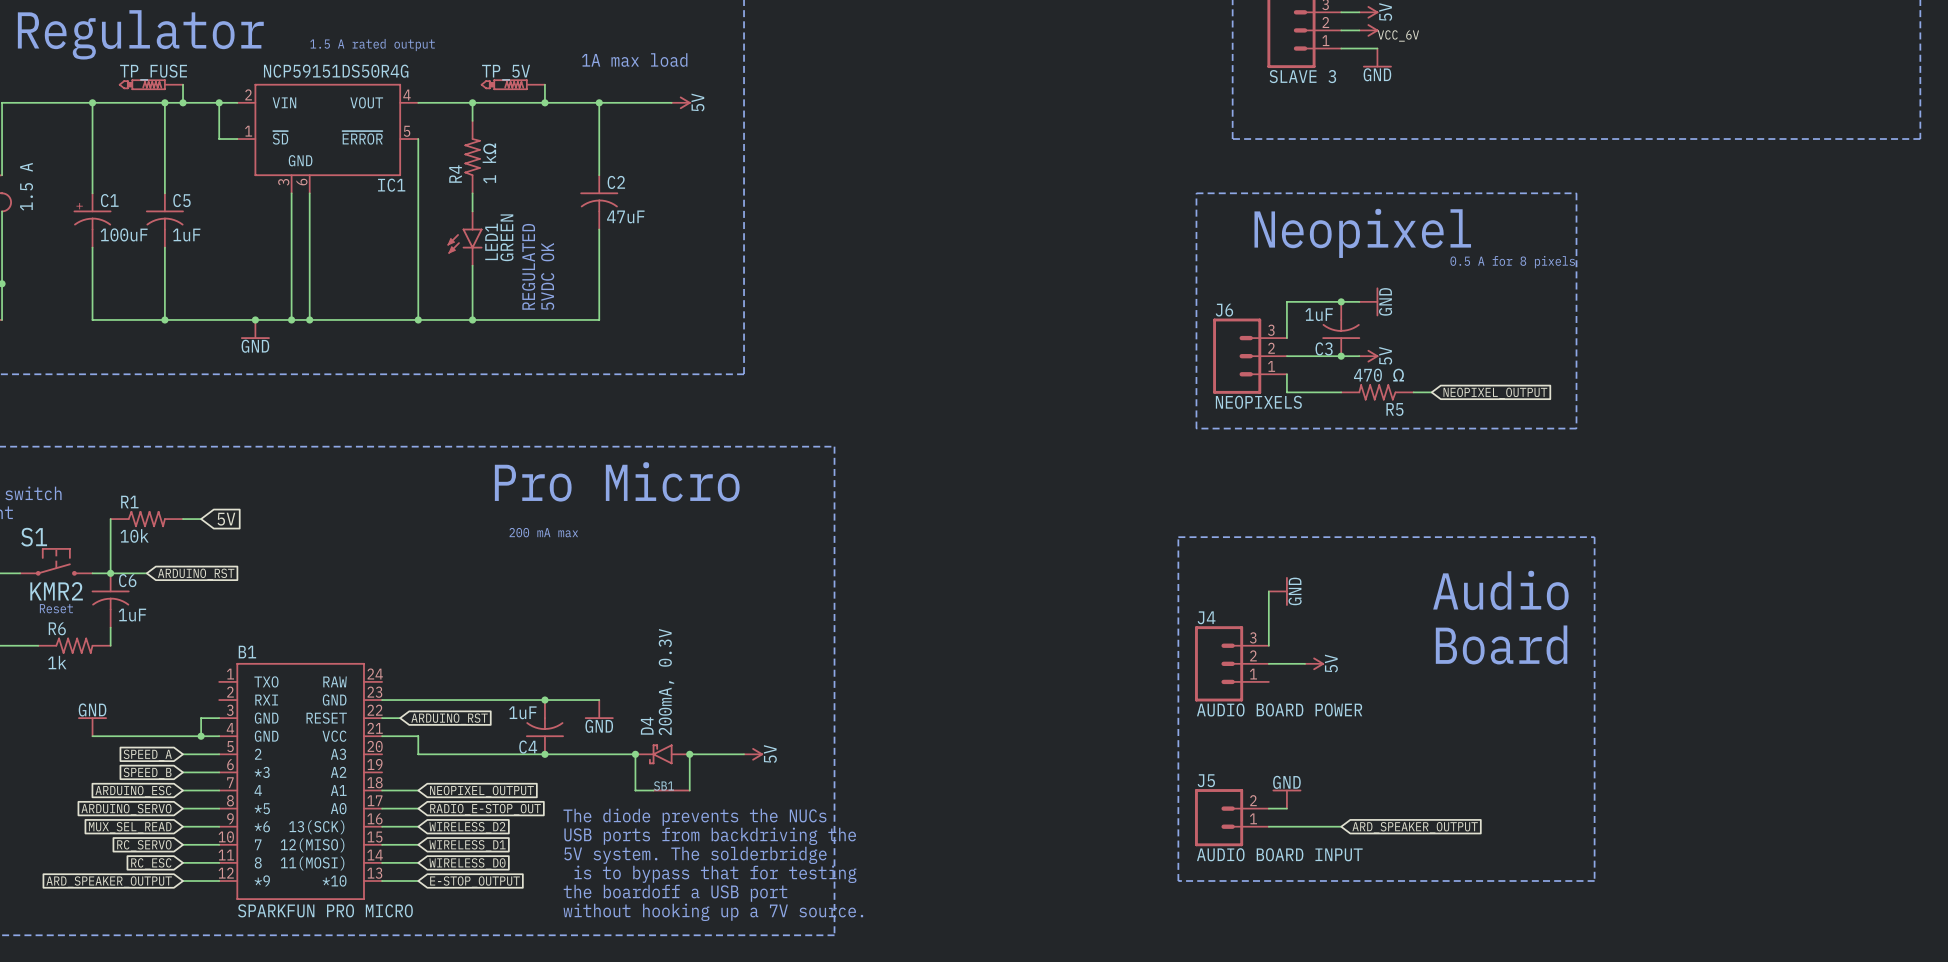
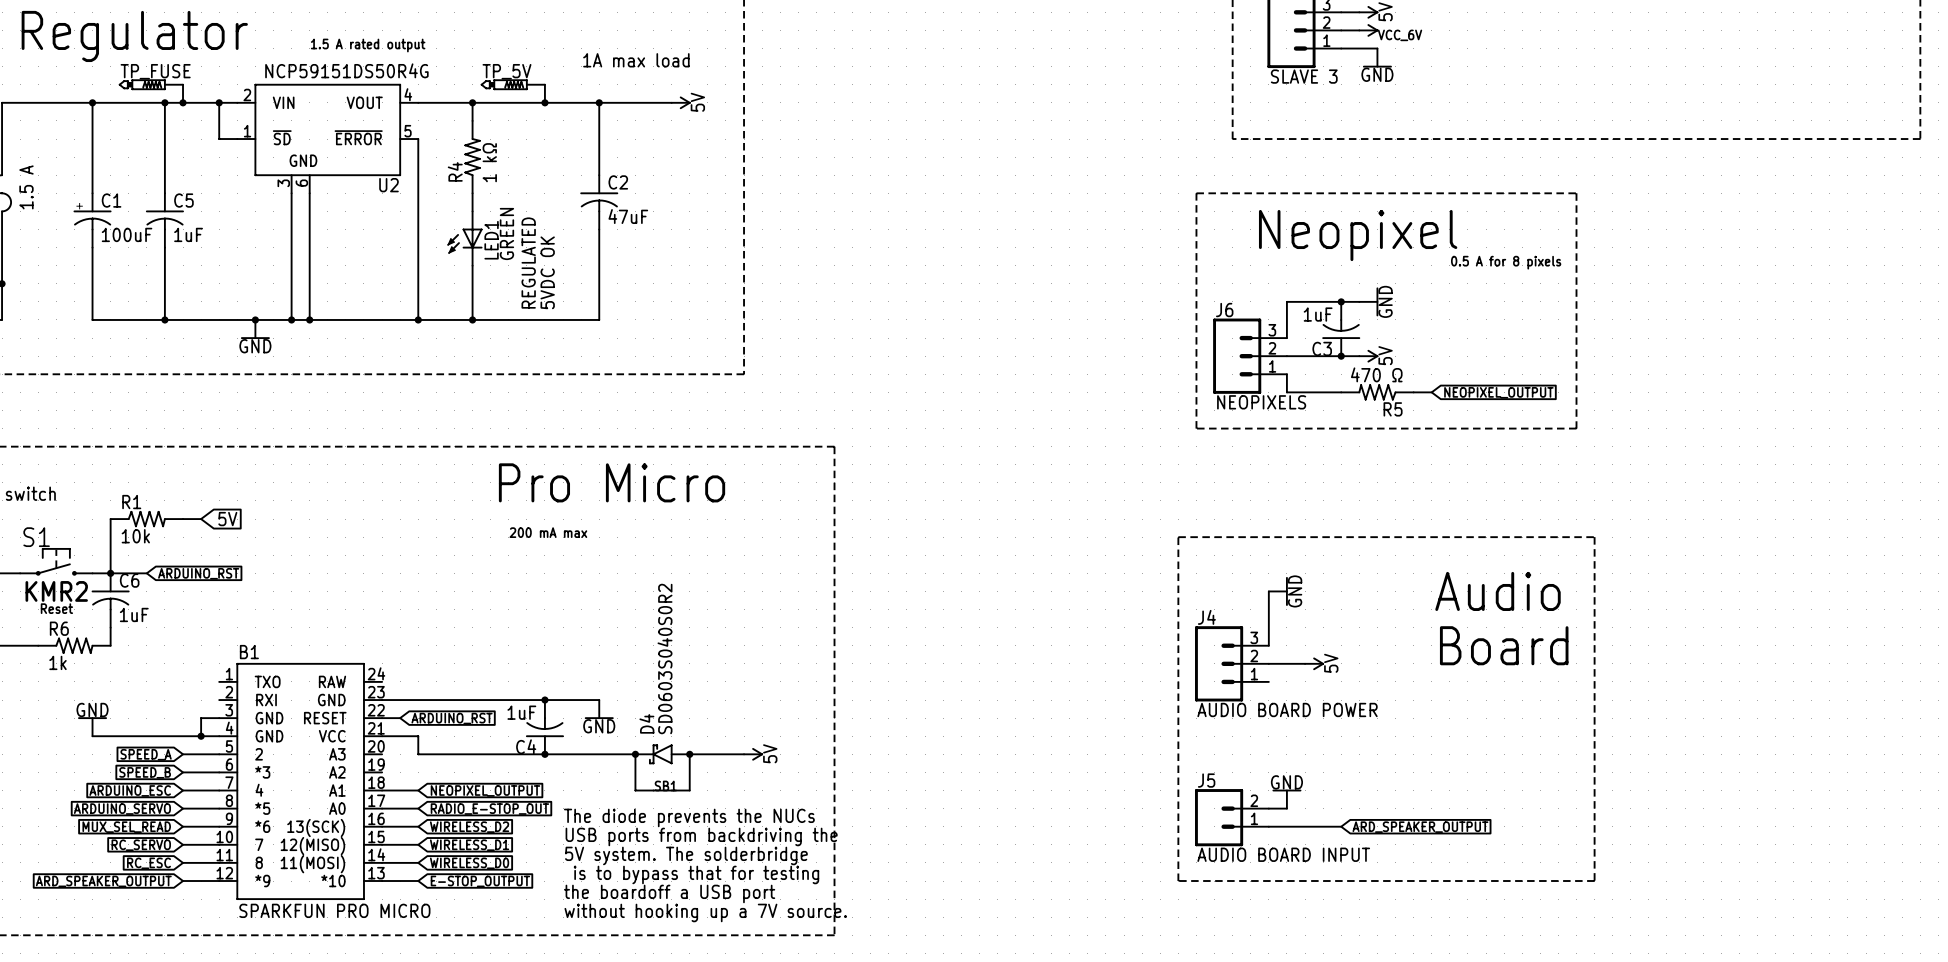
IC1 name: IC1 (391, 185) -> U2 (388, 185)
LED1 symbol: [447, 211, 483, 266] -> [447, 211, 483, 266]
D4 value: 200mA, 0.3V (666, 682) -> SD0603S040S0R2 (665, 659)

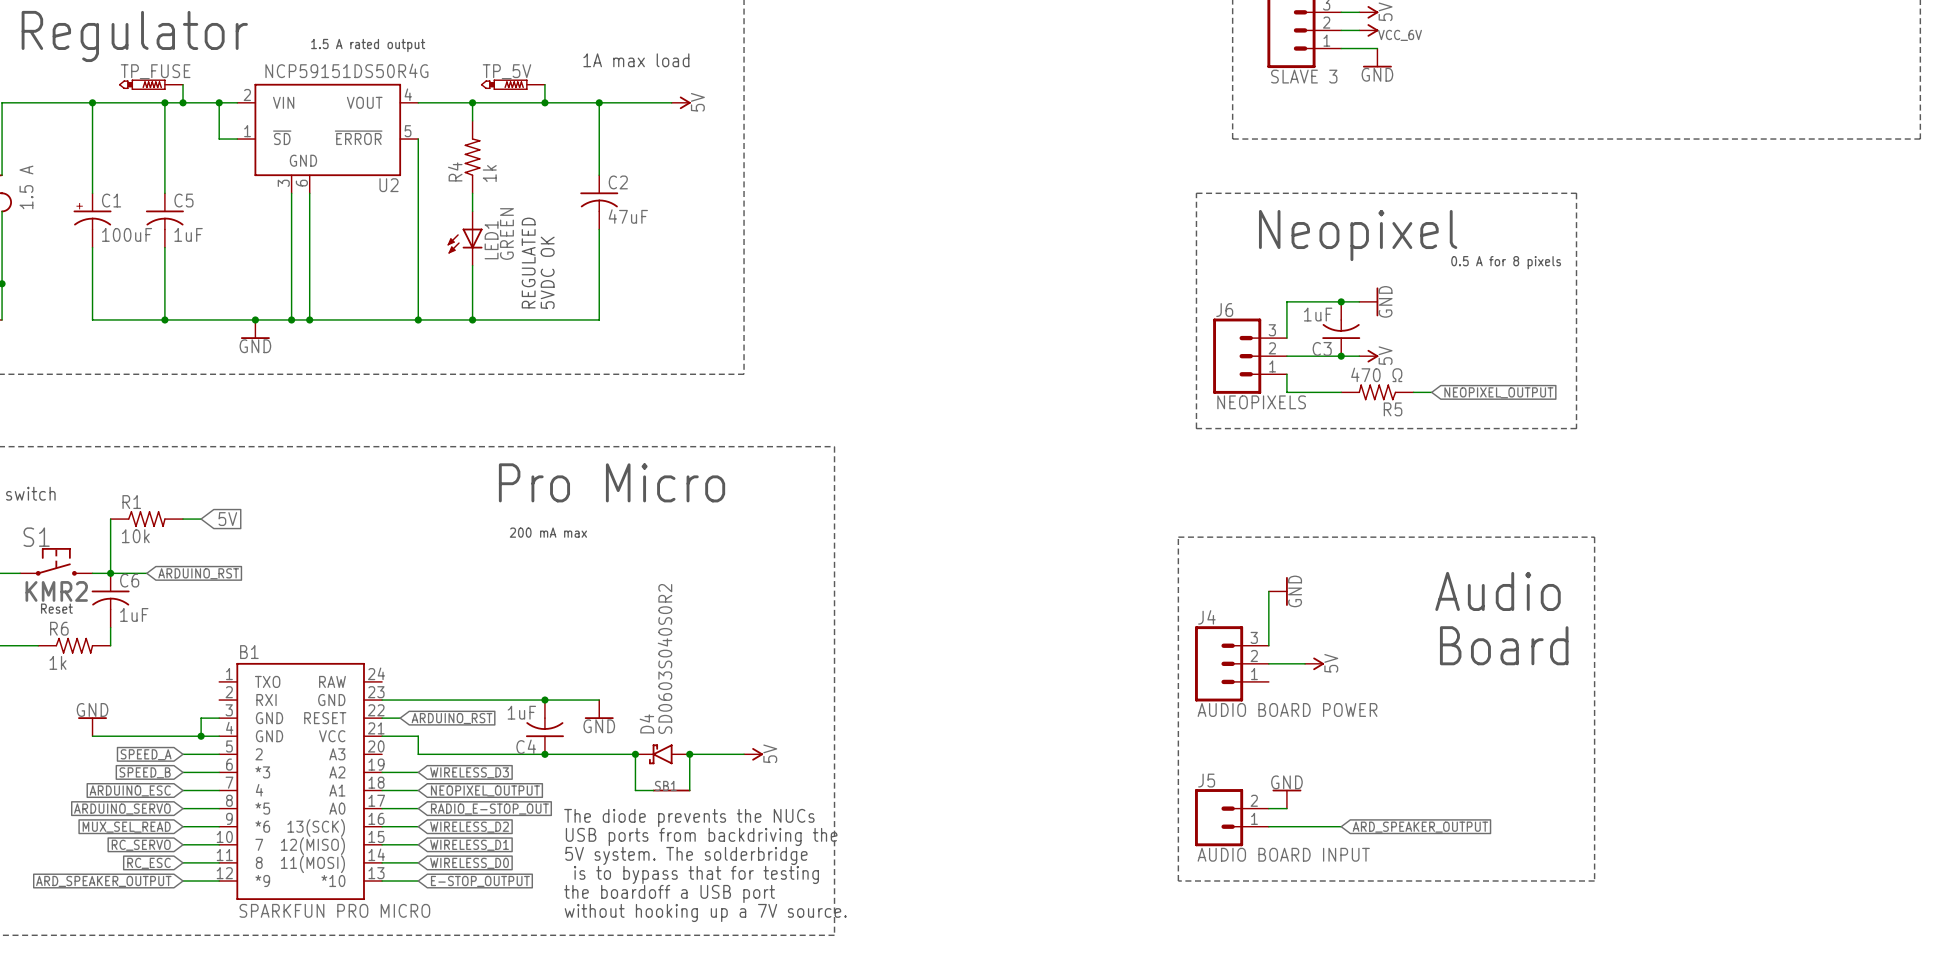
R4 value: 1 kΩ (489, 162) -> 1k (489, 173)
wire: none -> (382, 772) (418, 772)
global label: none -> WIRELESS_D3 (469, 772)

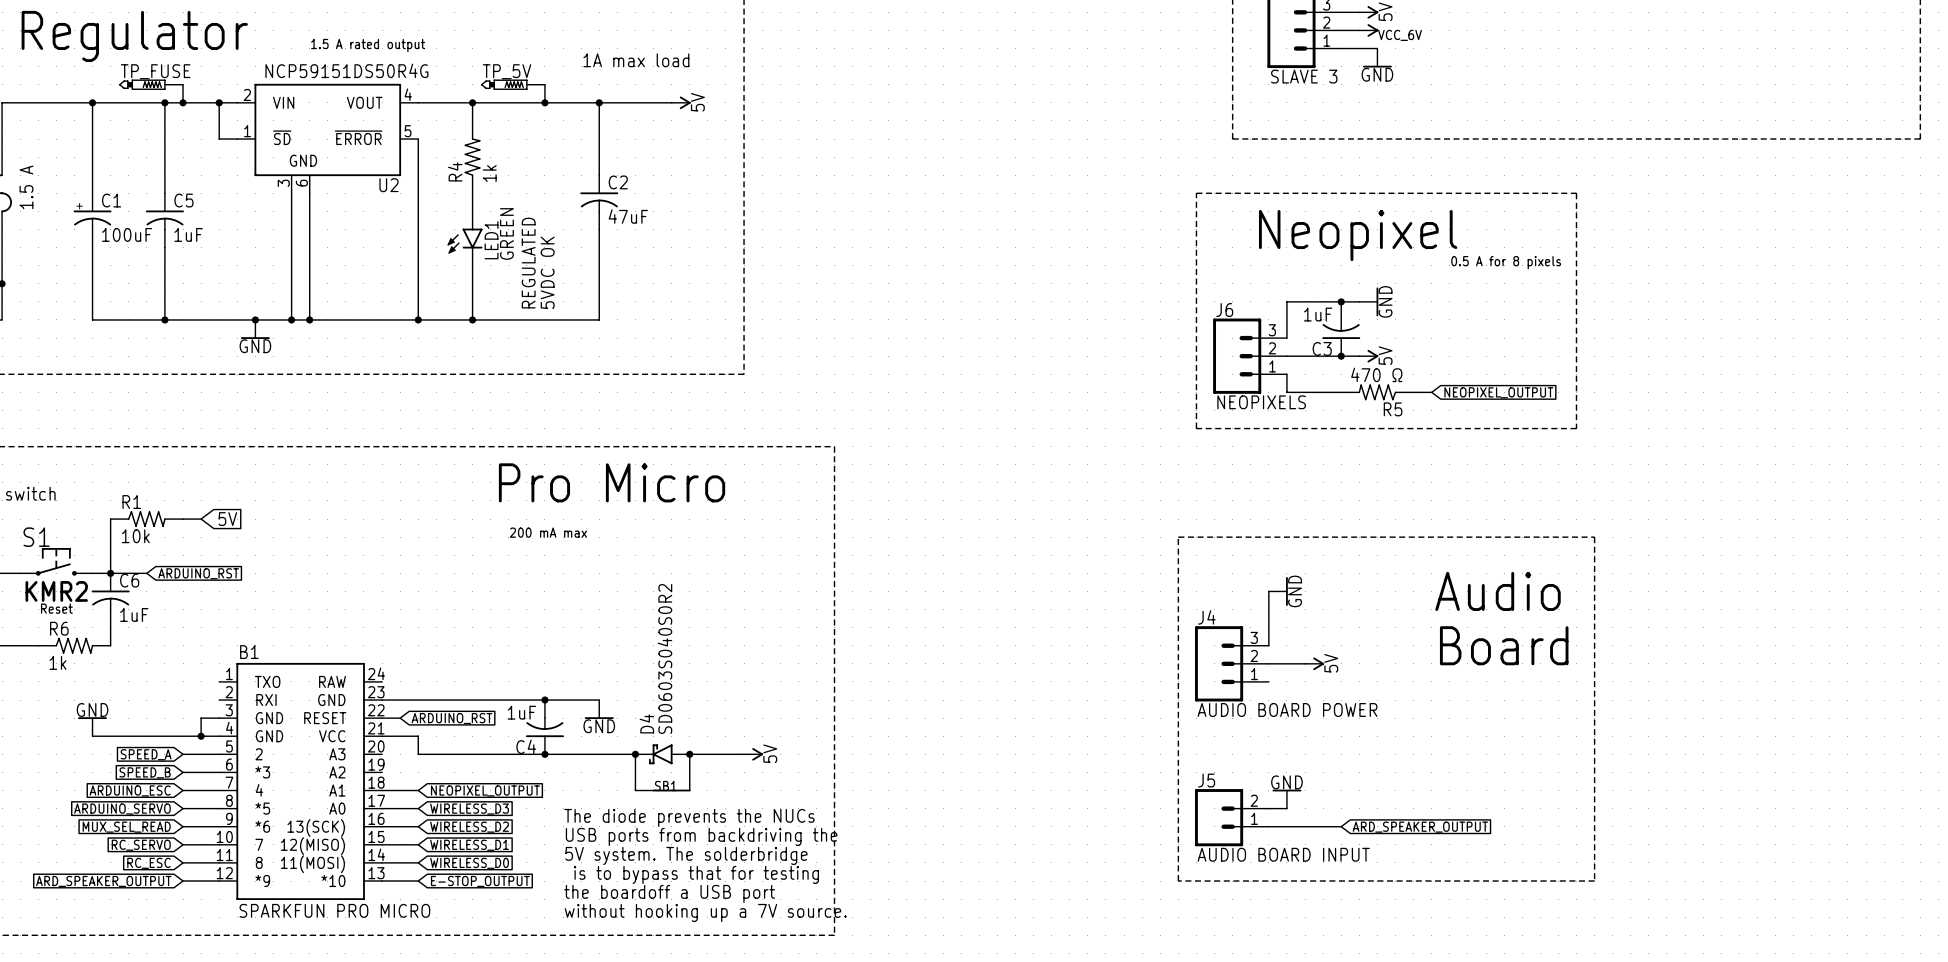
LED1 symbol: [447, 211, 483, 266] -> [447, 211, 483, 266]
wire: (382, 772) (418, 772) -> none
global label: WIRELESS_D3 (469, 772) -> none
global label: RADIO_E-STOP_OUT (489, 809) -> WIRELESS_D3 (469, 809)

